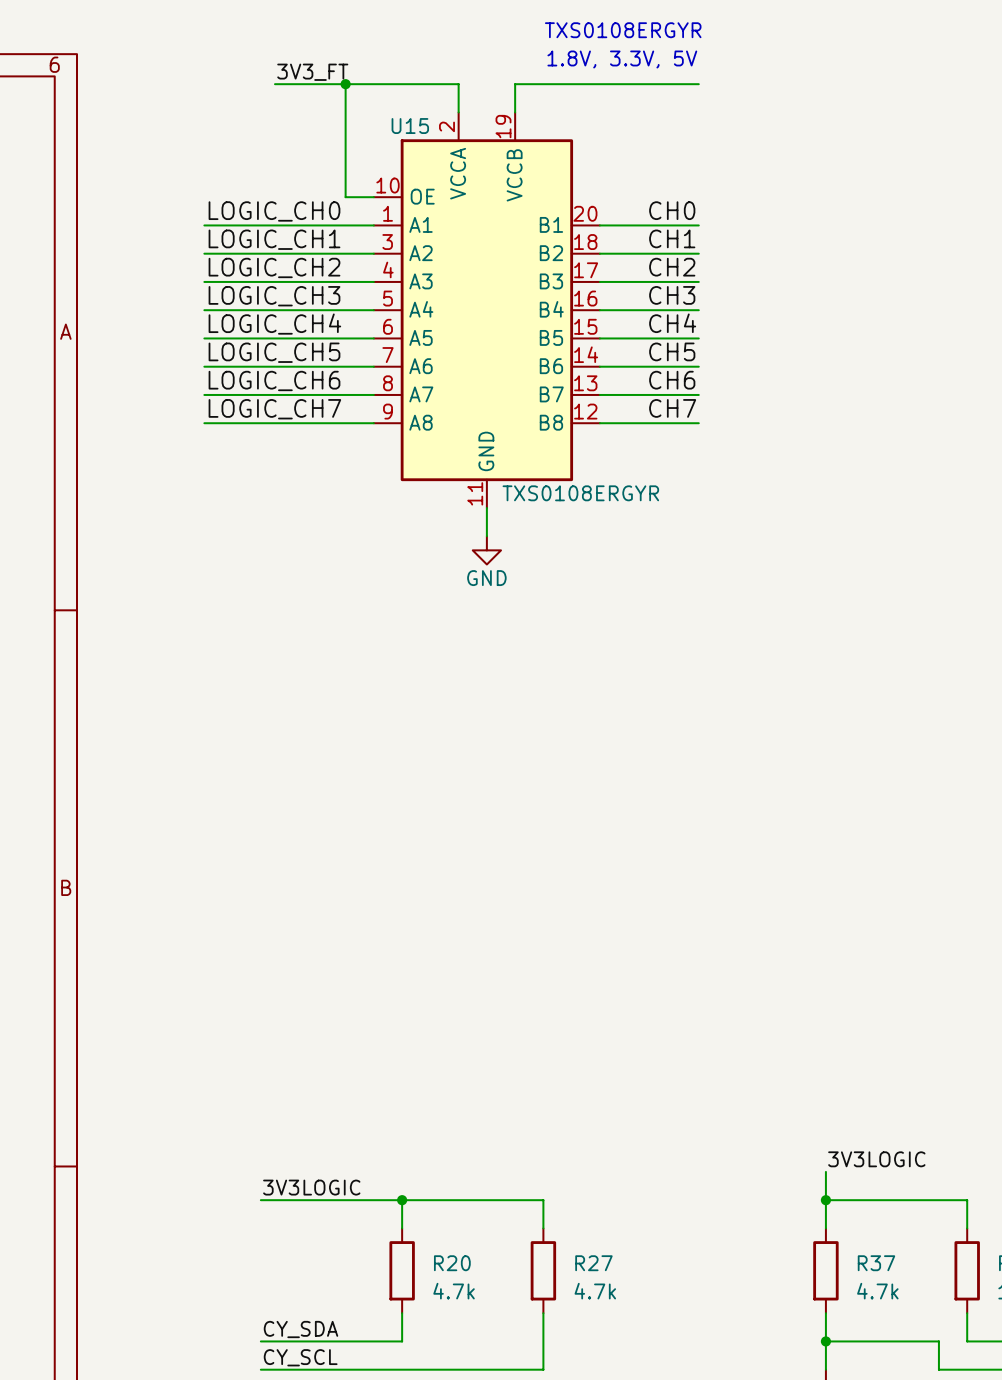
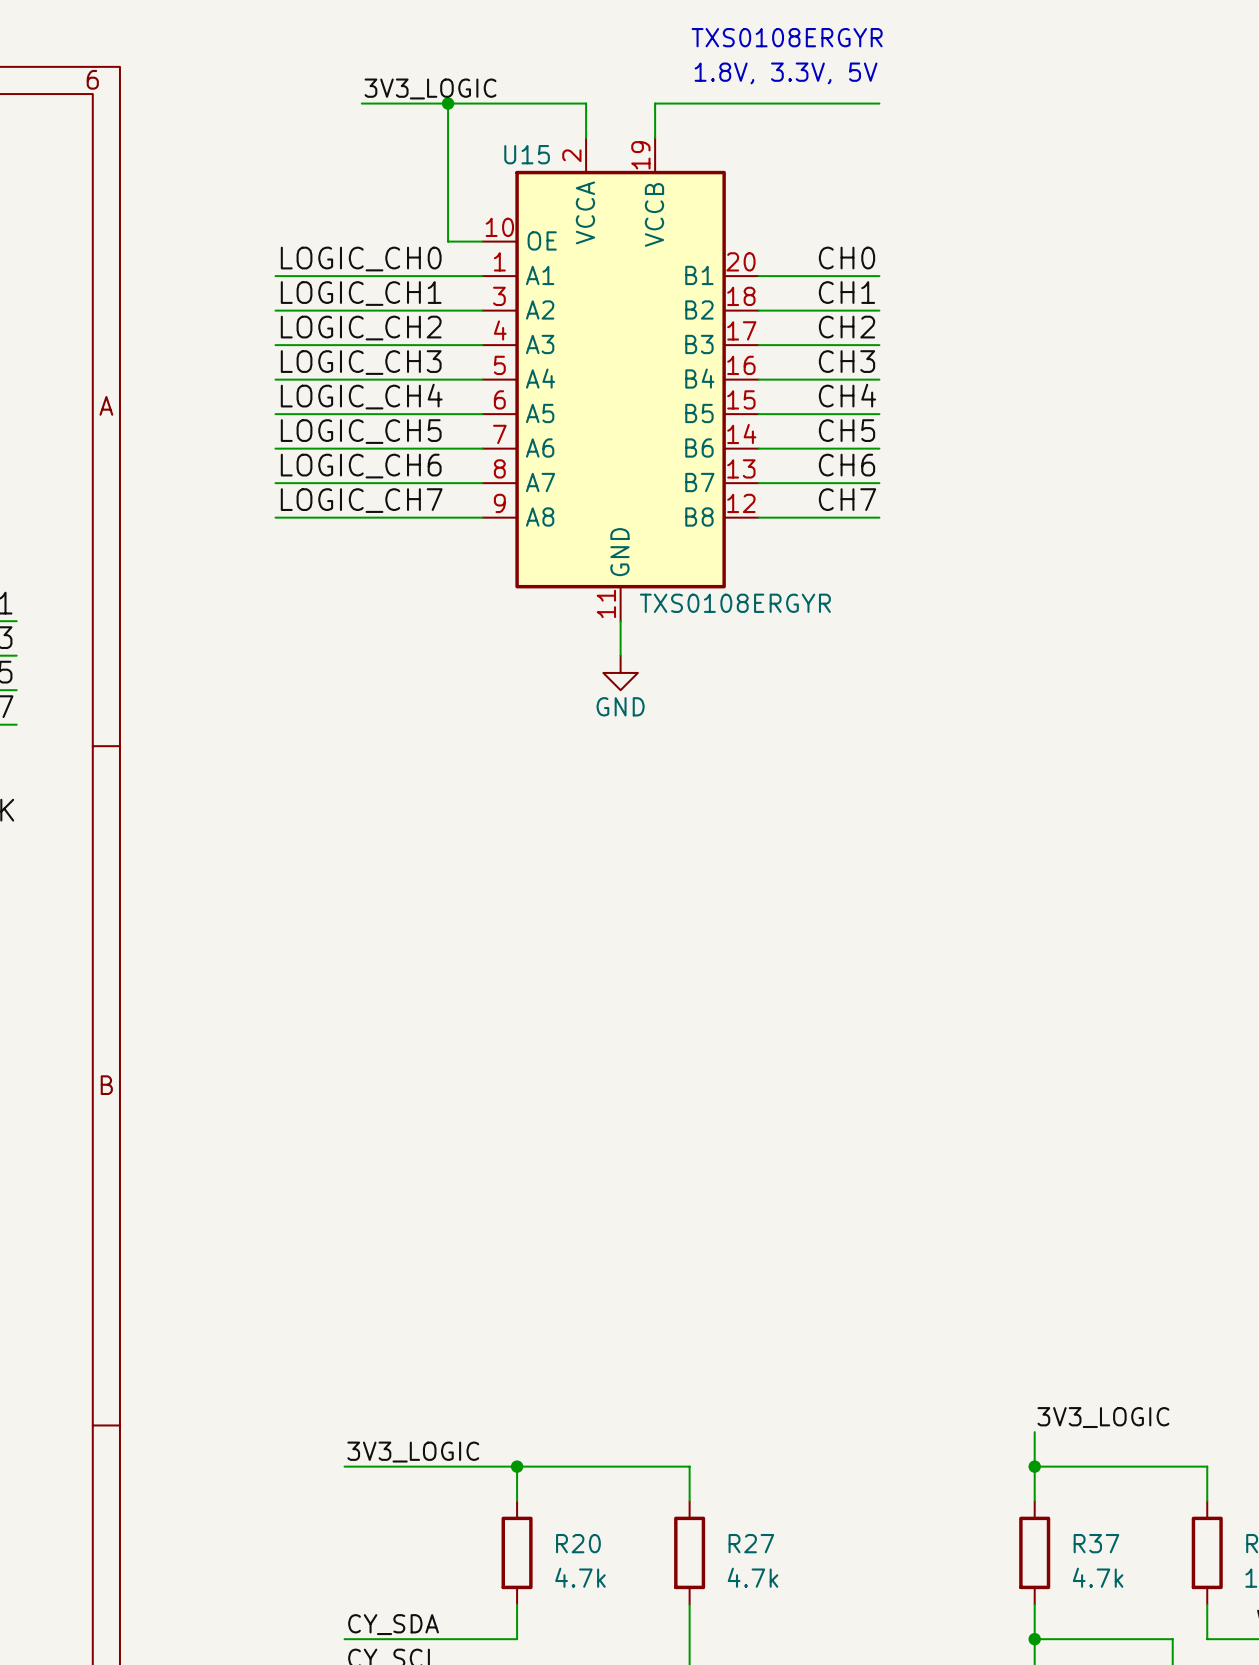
label: 3V3_FT (312, 72) -> 3V3_LOGIC (430, 88)
label: 3V3LOGIC (876, 1159) -> 3V3_LOGIC (1103, 1417)
label: 3V3LOGIC (311, 1187) -> 3V3_LOGIC (413, 1452)

